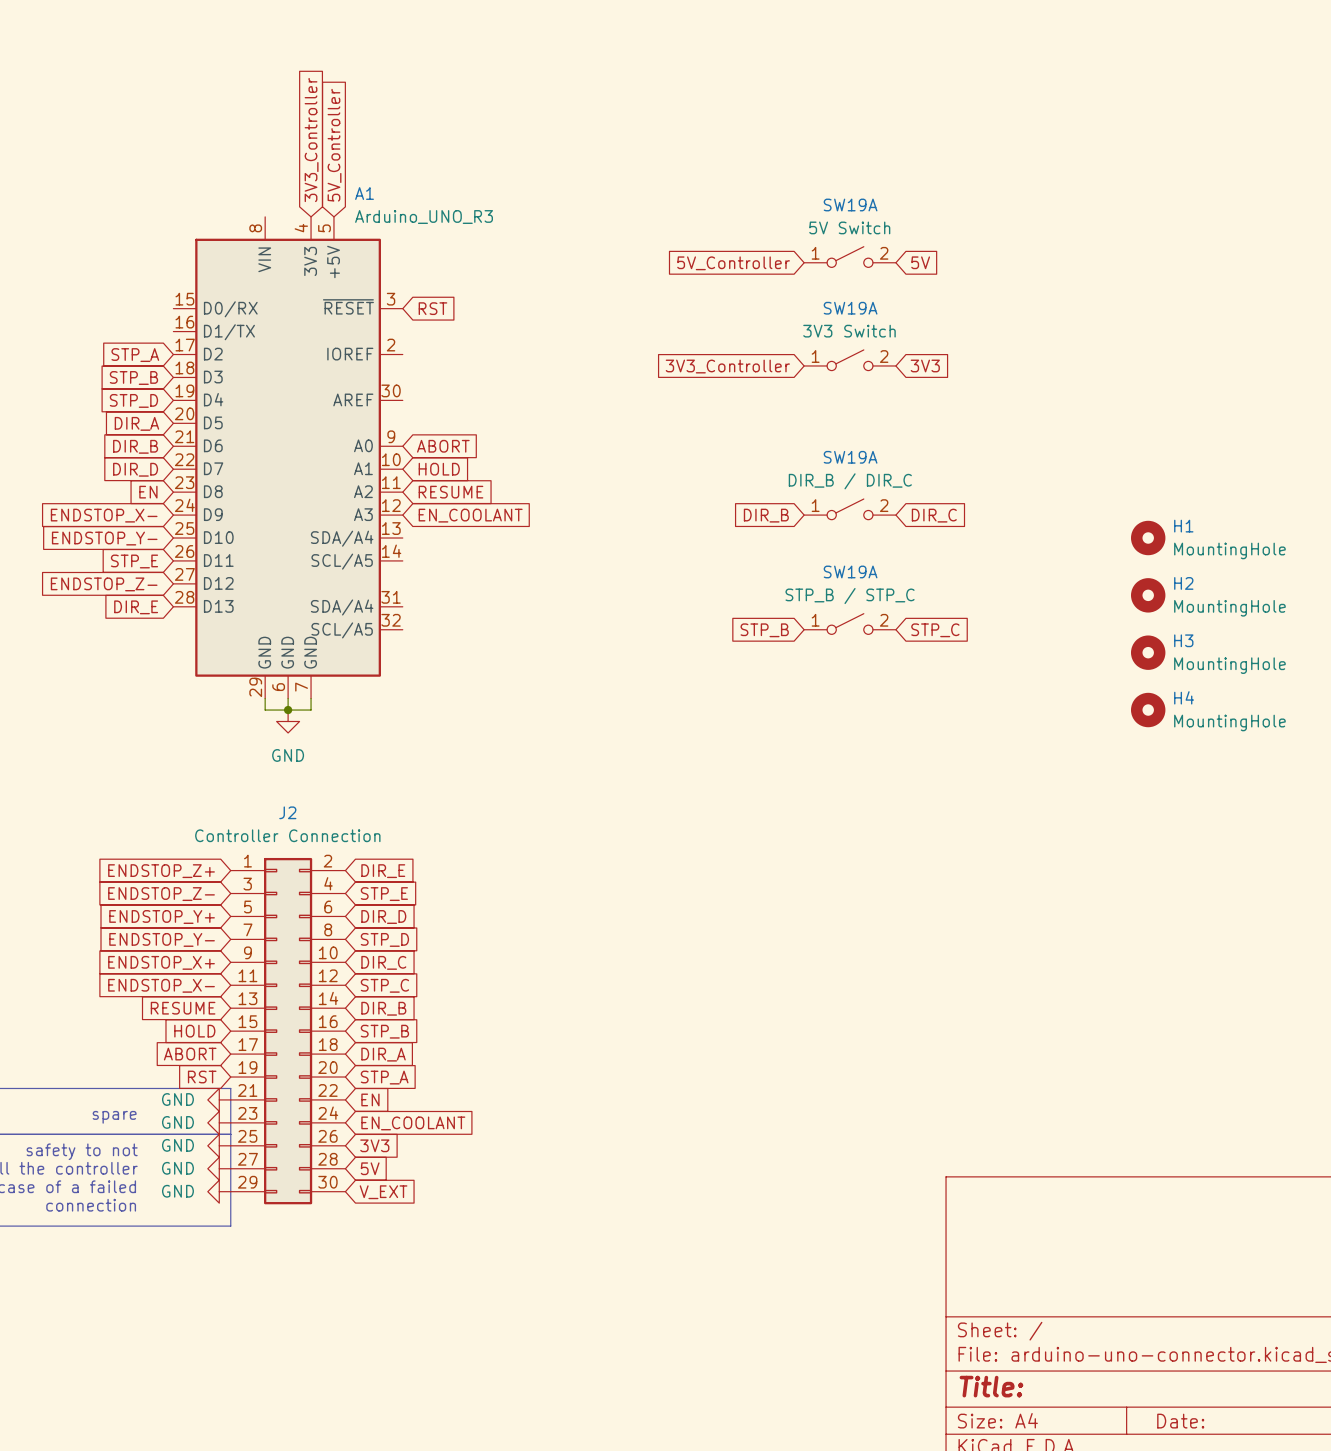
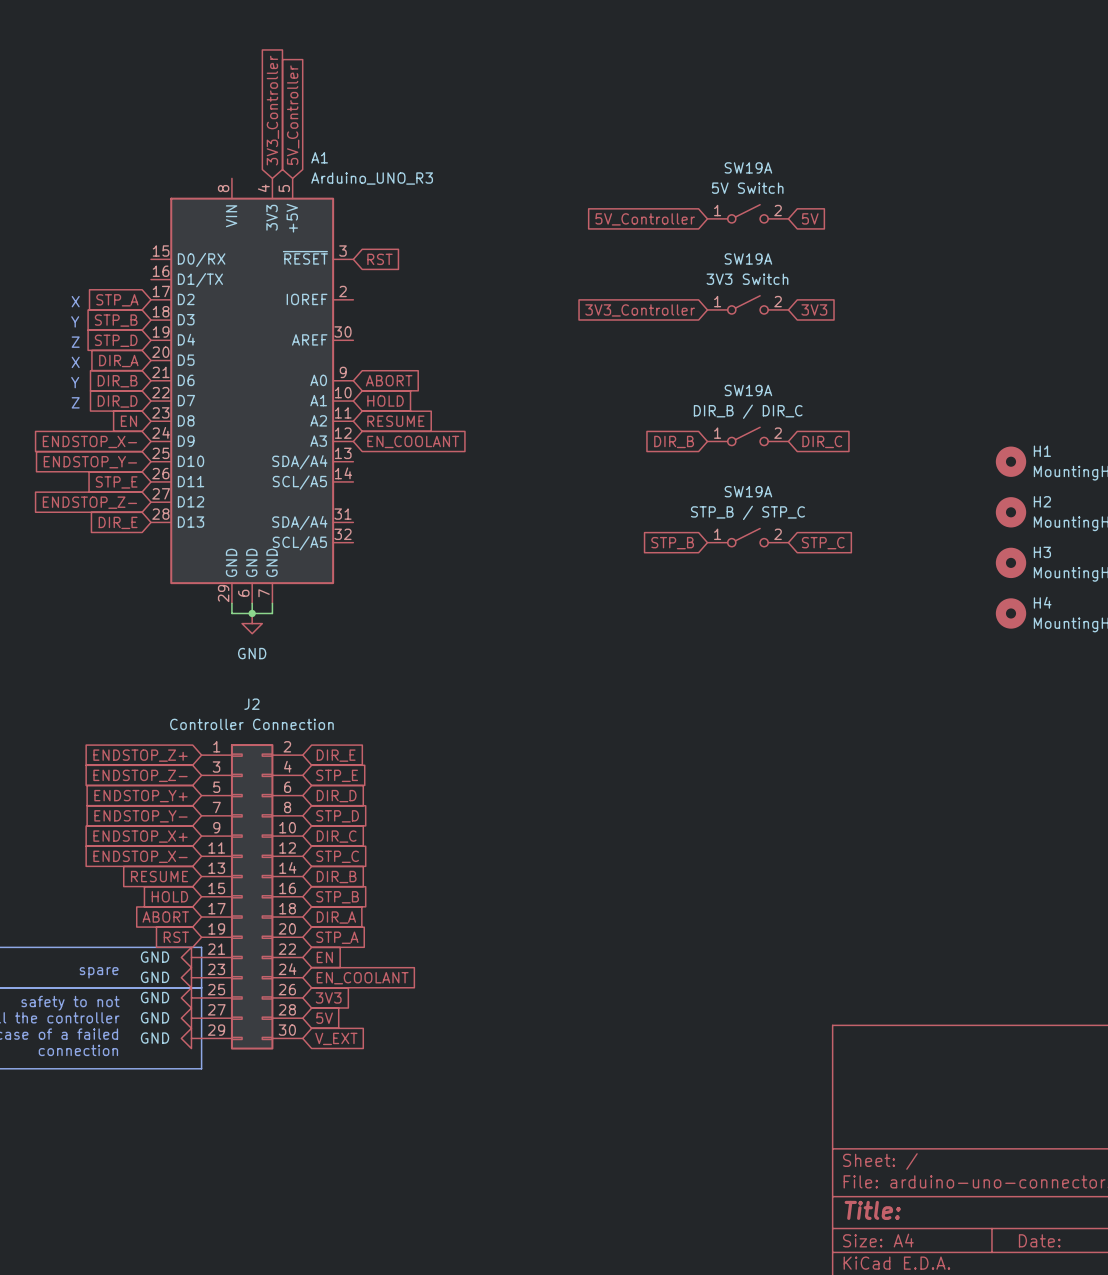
text: none -> X (75, 301)
text: none -> Y (75, 321)
text: none -> Z (75, 342)
text: none -> X (75, 362)
text: none -> Y (75, 382)
text: none -> Z (75, 402)

